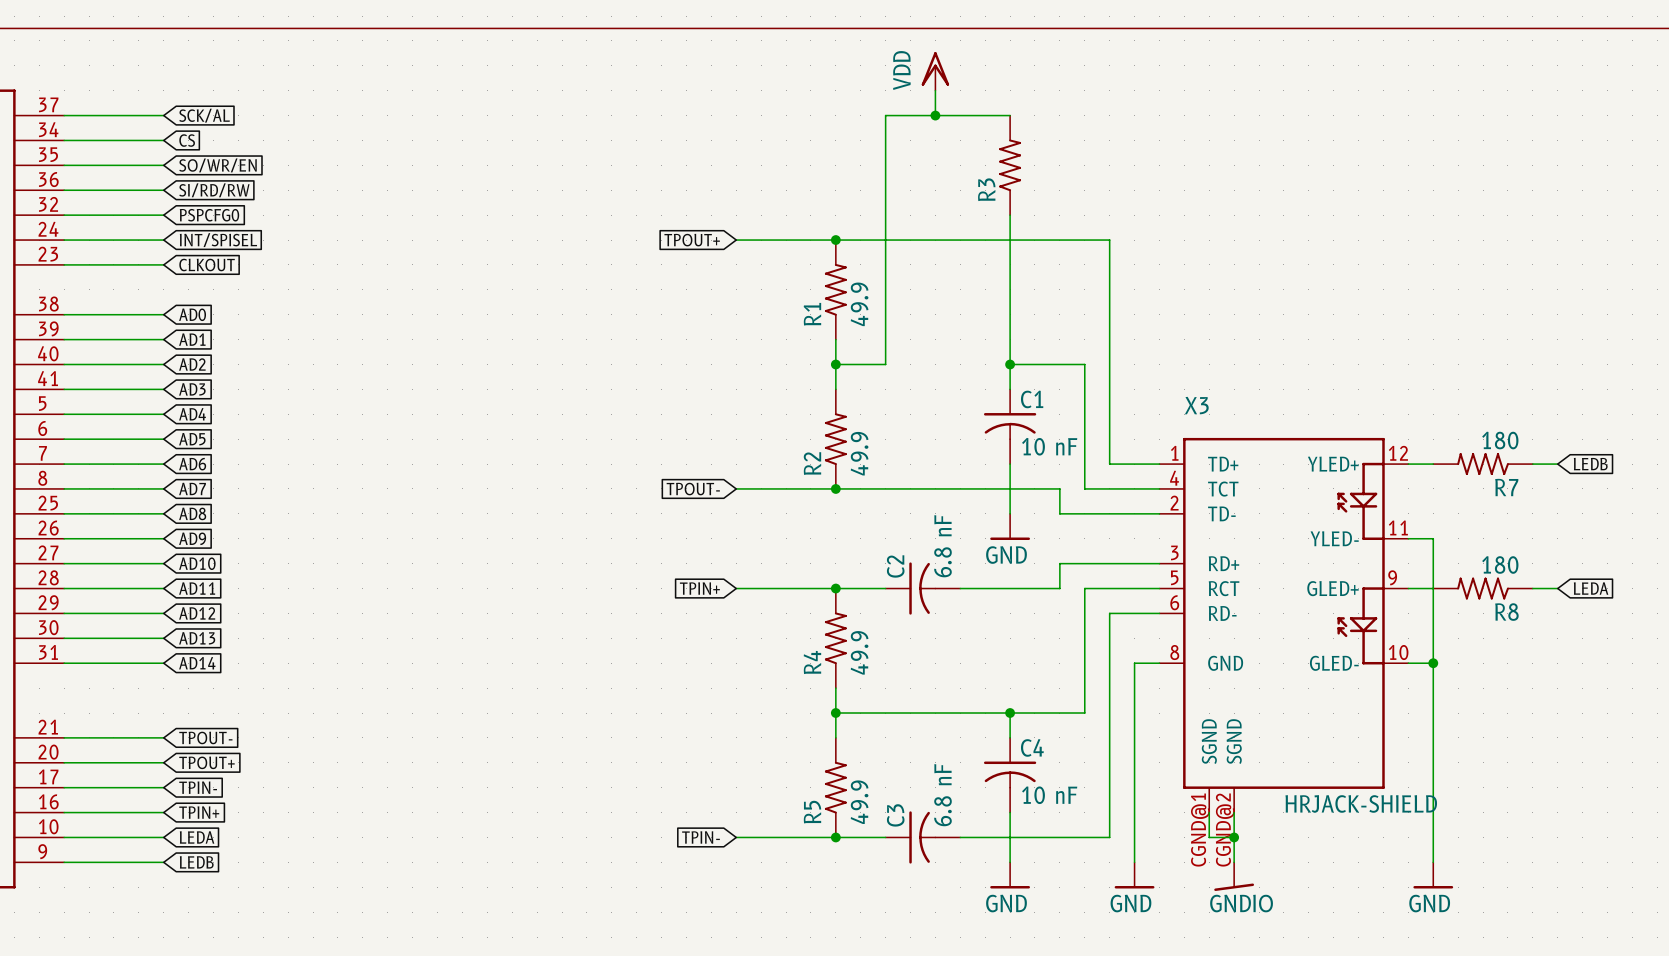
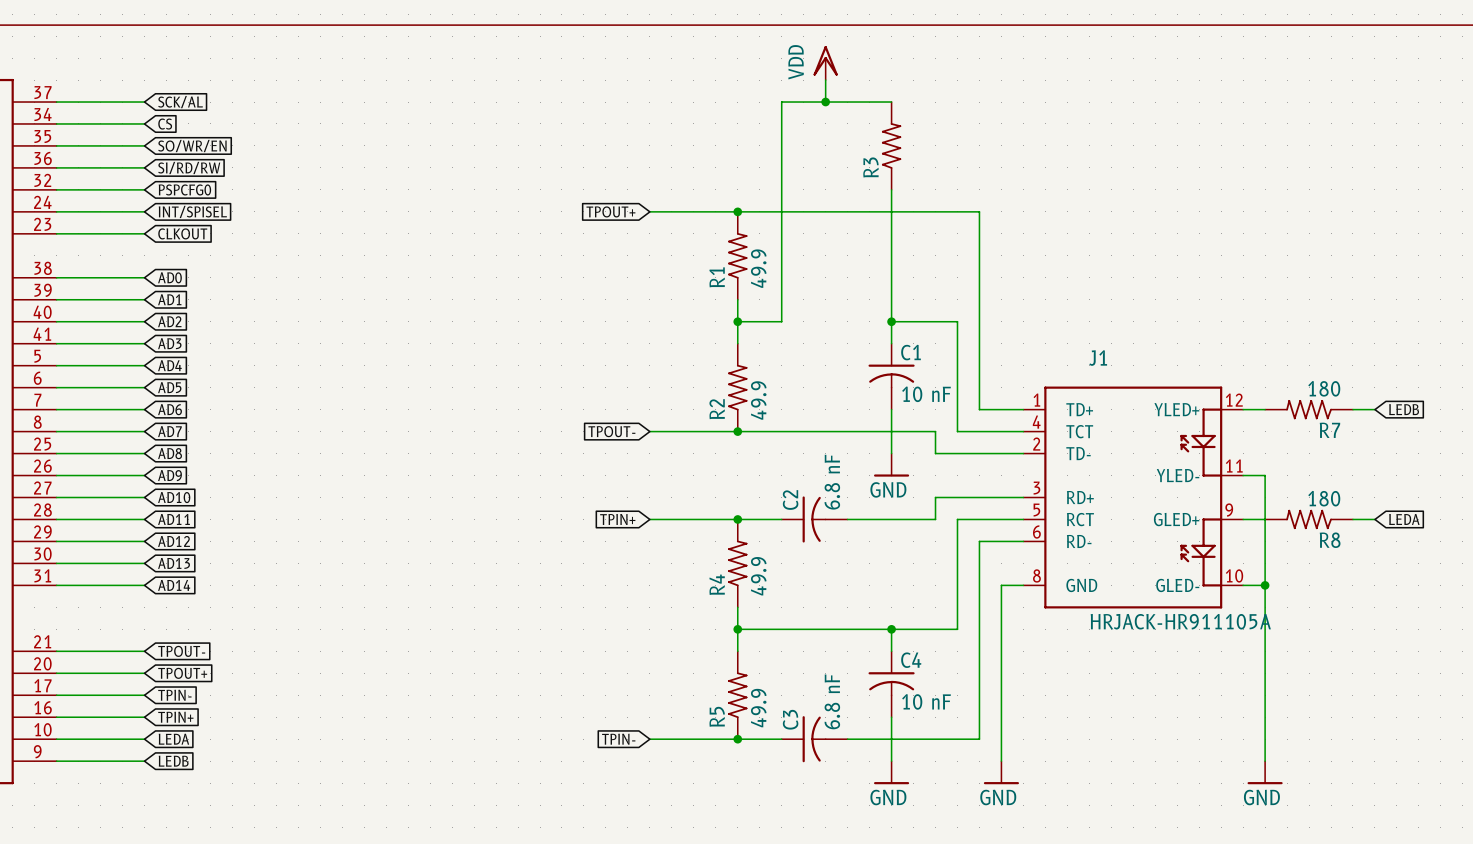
J1: none -> HRJACK-HR911105A (1133, 497)
X3: HRJACK-SHIELD (1283, 625) -> none
wire: (1209, 812) (1209, 837) (1234, 837) -> none
wire: (1234, 812) (1234, 862) -> none
junction: (1234, 837) -> none
power symbol: GNDIO (1234, 876) -> none

